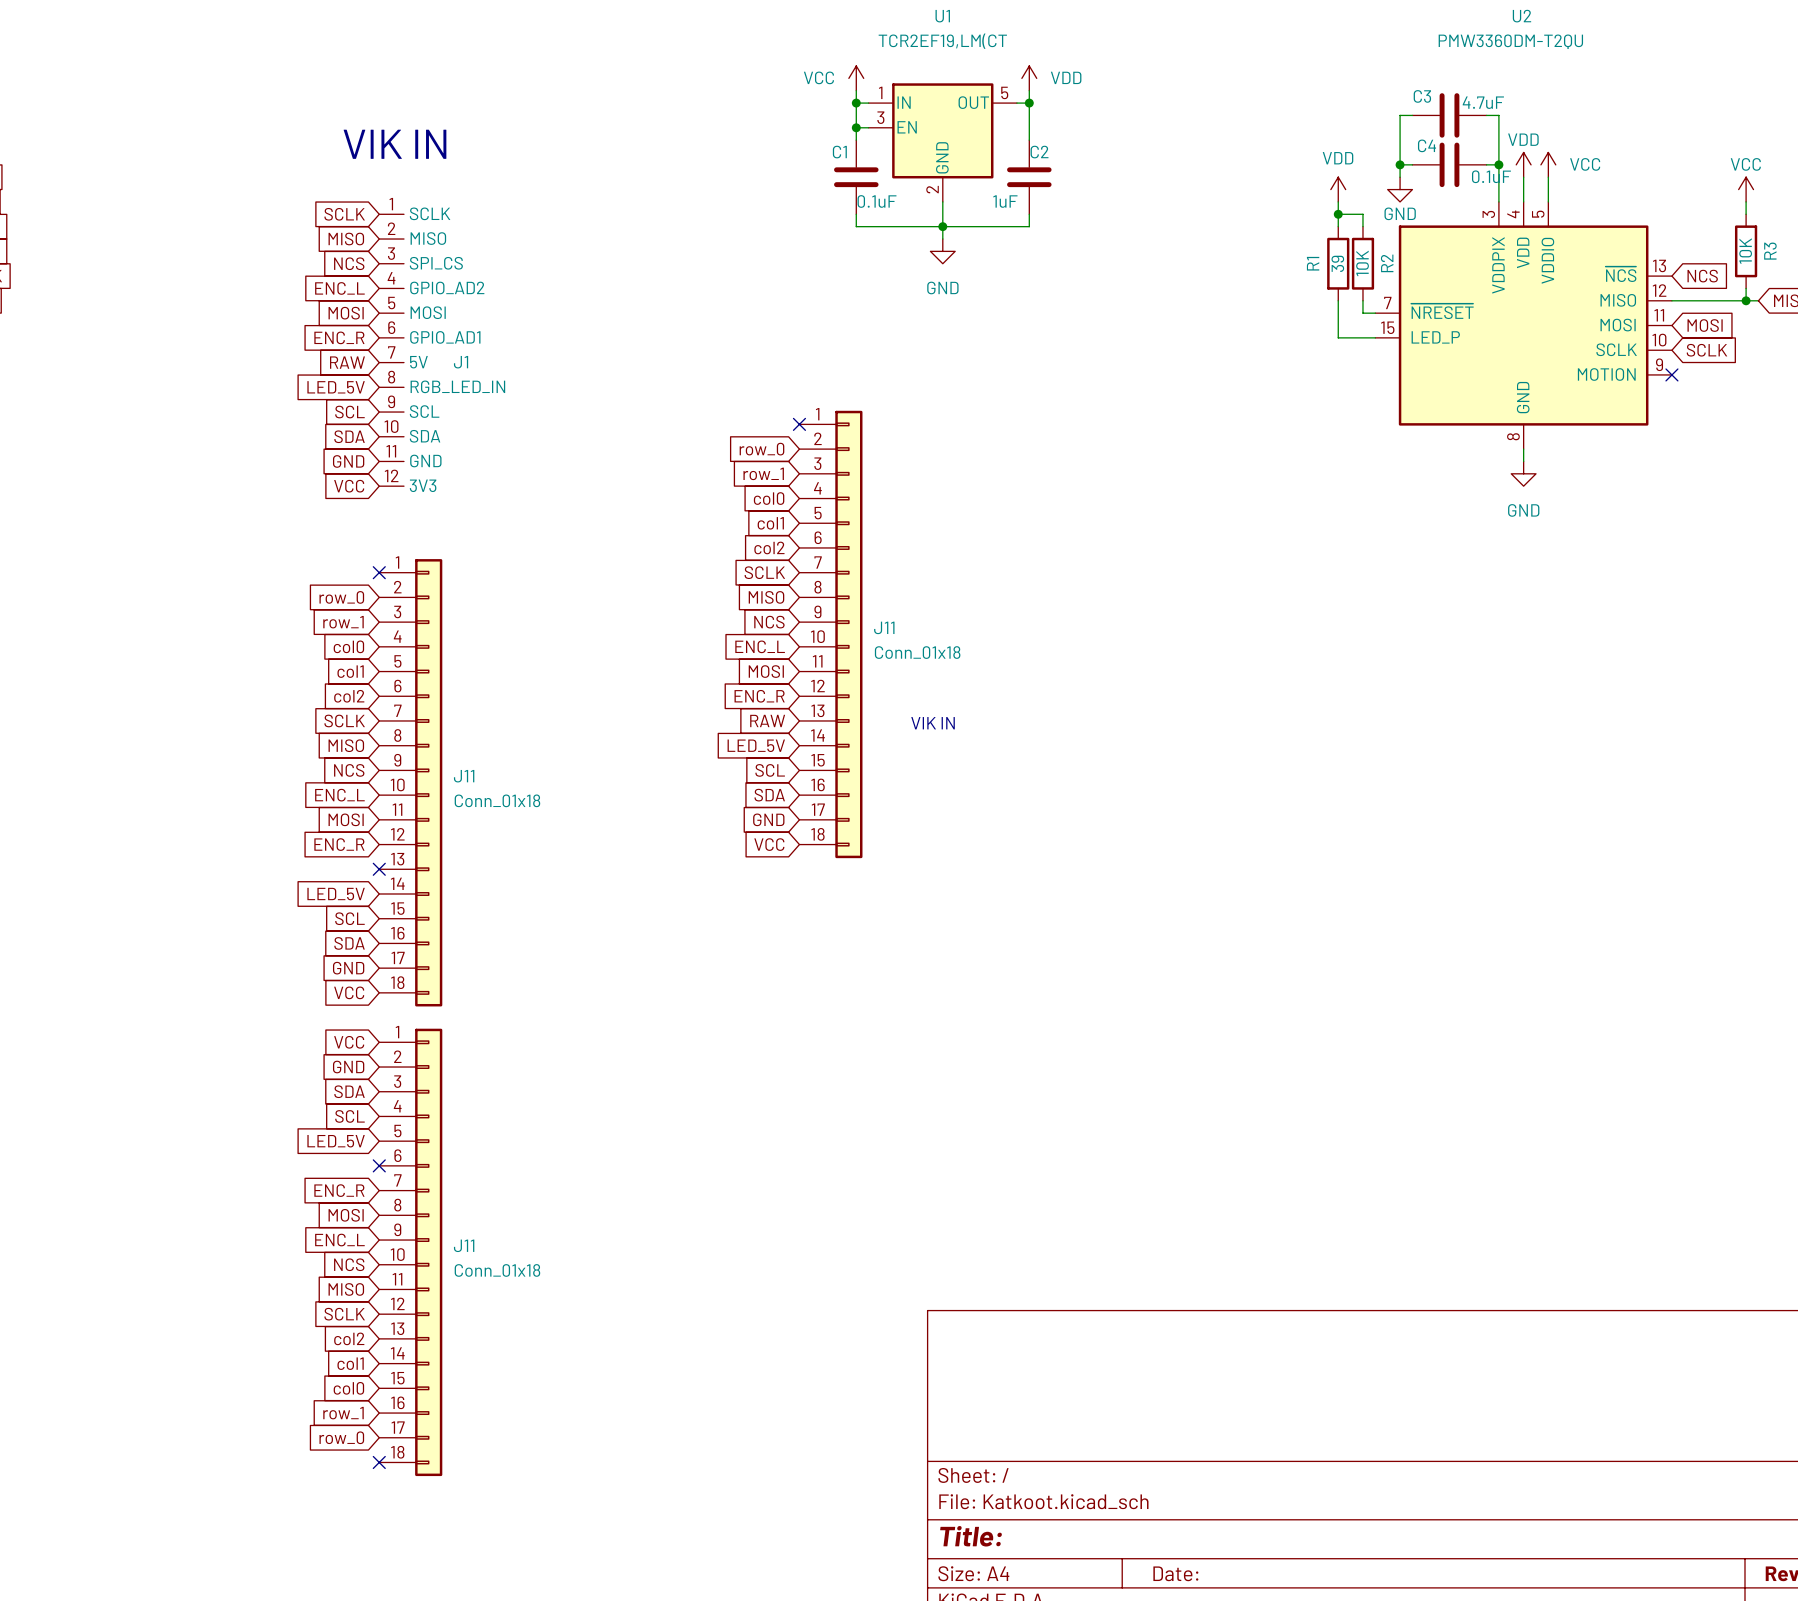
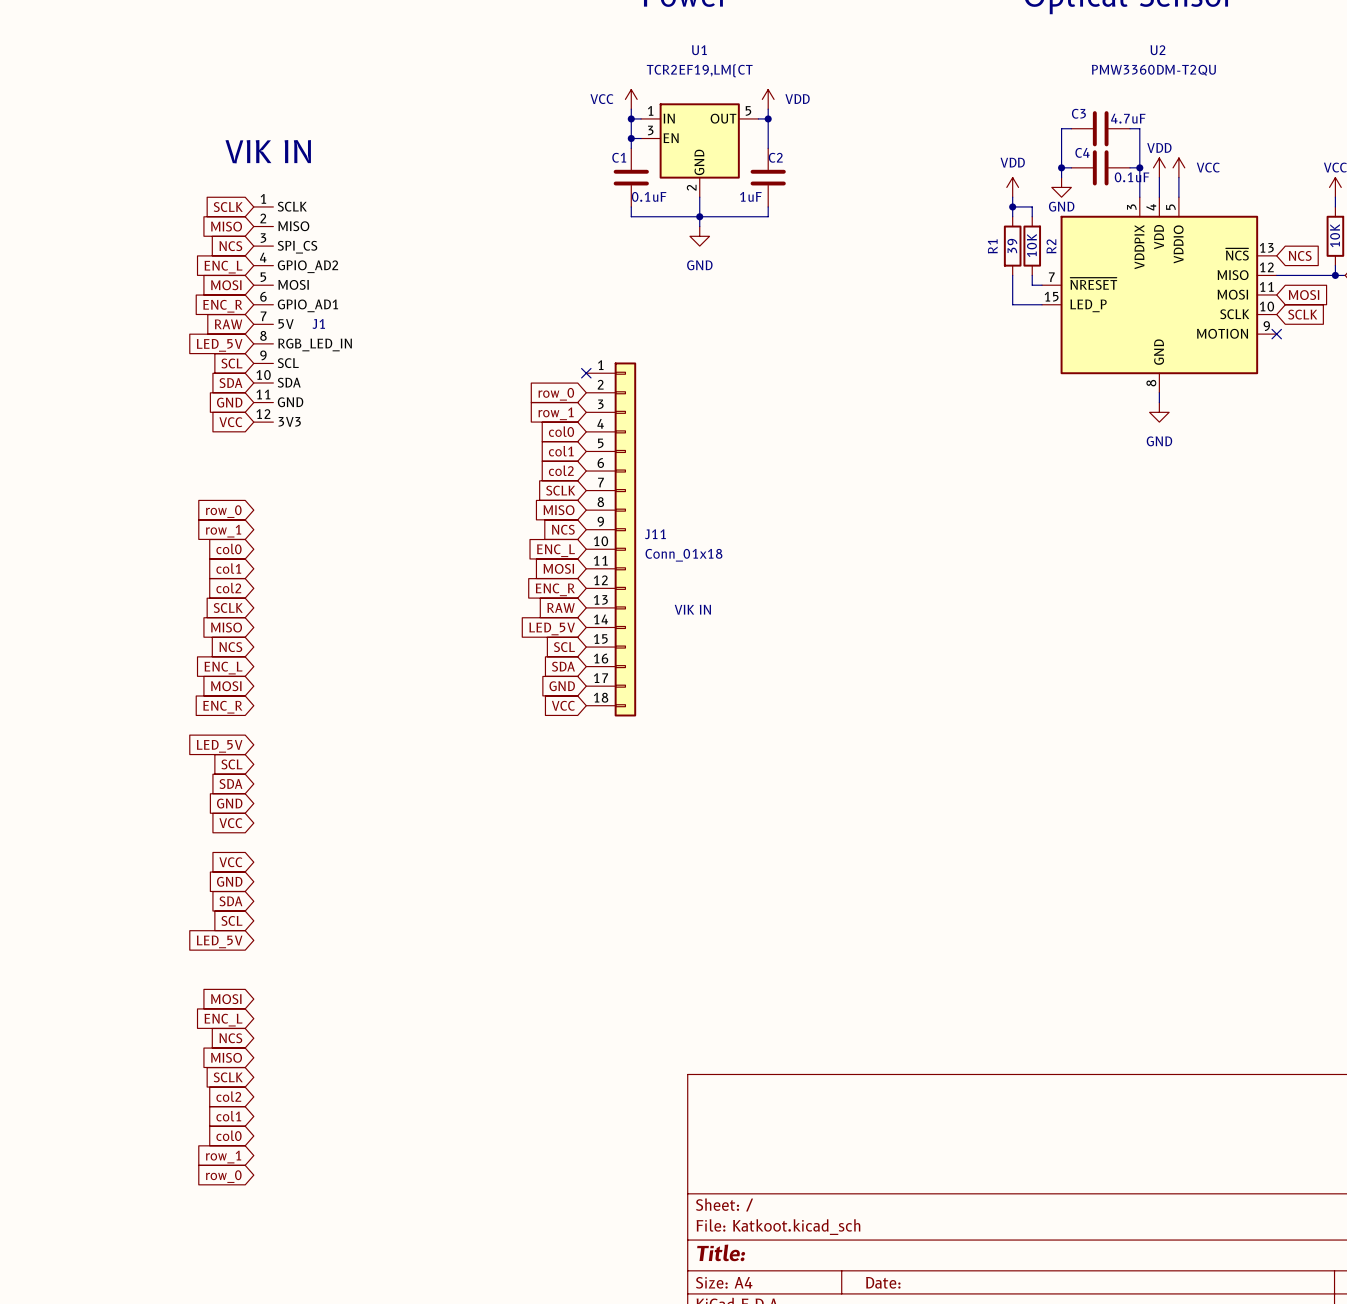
no-connect mark: (379, 572) -> none
J11: Conn_01x18 (410, 782) -> none
no-connect mark: (379, 869) -> none
no-connect mark: (379, 1165) -> none
global label: ENC_R (339, 1190) -> none
J11: Conn_01x18 (410, 1252) -> none
no-connect mark: (379, 1462) -> none

